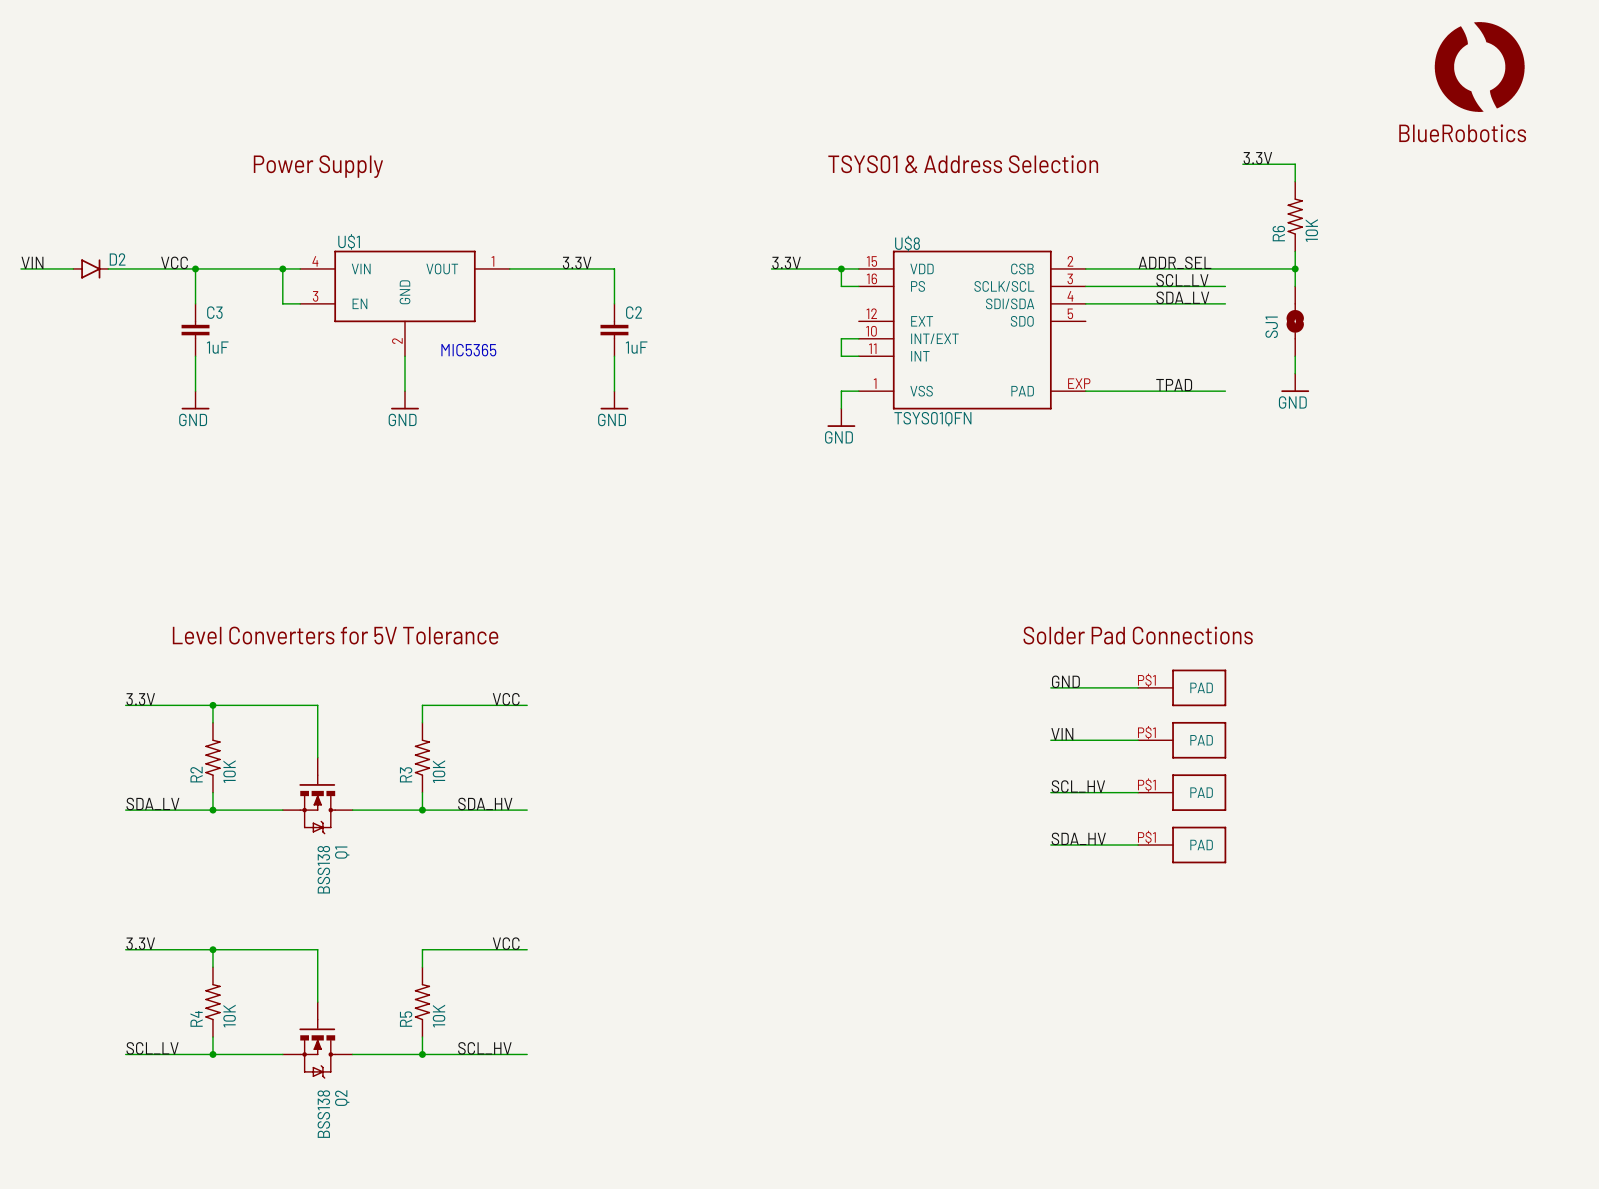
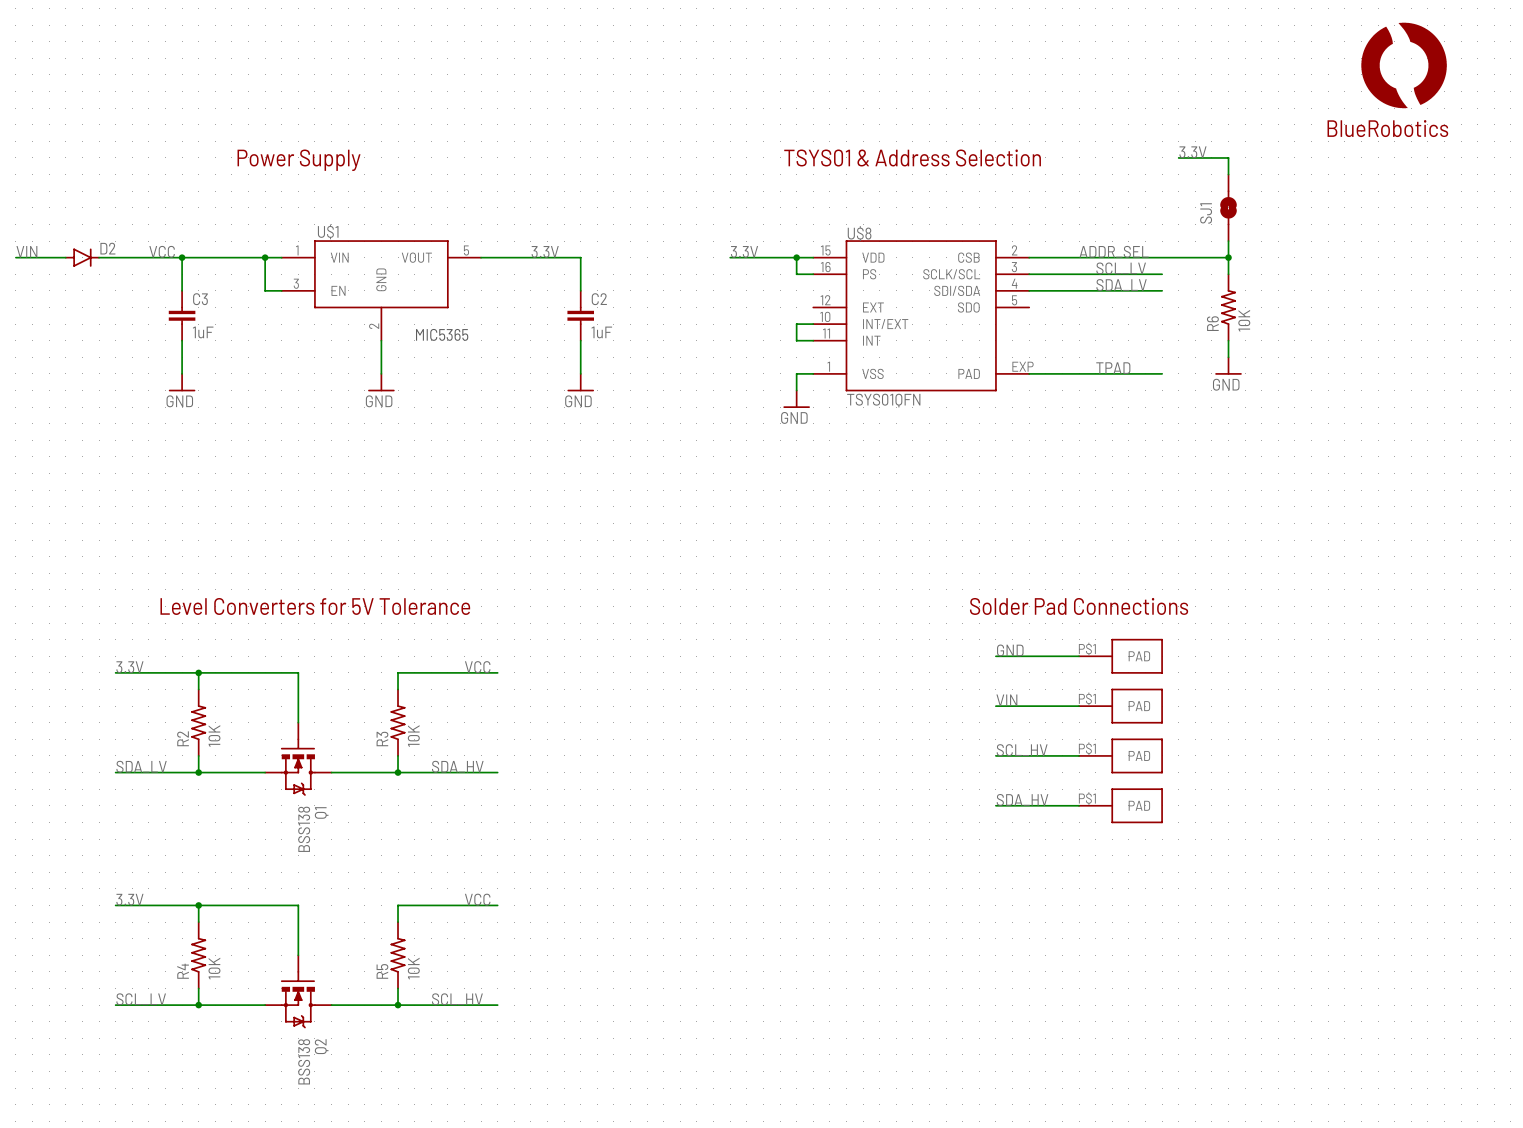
R6 position: (1295, 216) -> (1228, 307)
U$1 pin number: 4 (315, 261) -> 1 (297, 250)
U$1 pin number: 1 (492, 261) -> 5 (466, 250)
SJ1 position: (1295, 321) -> (1228, 207)

